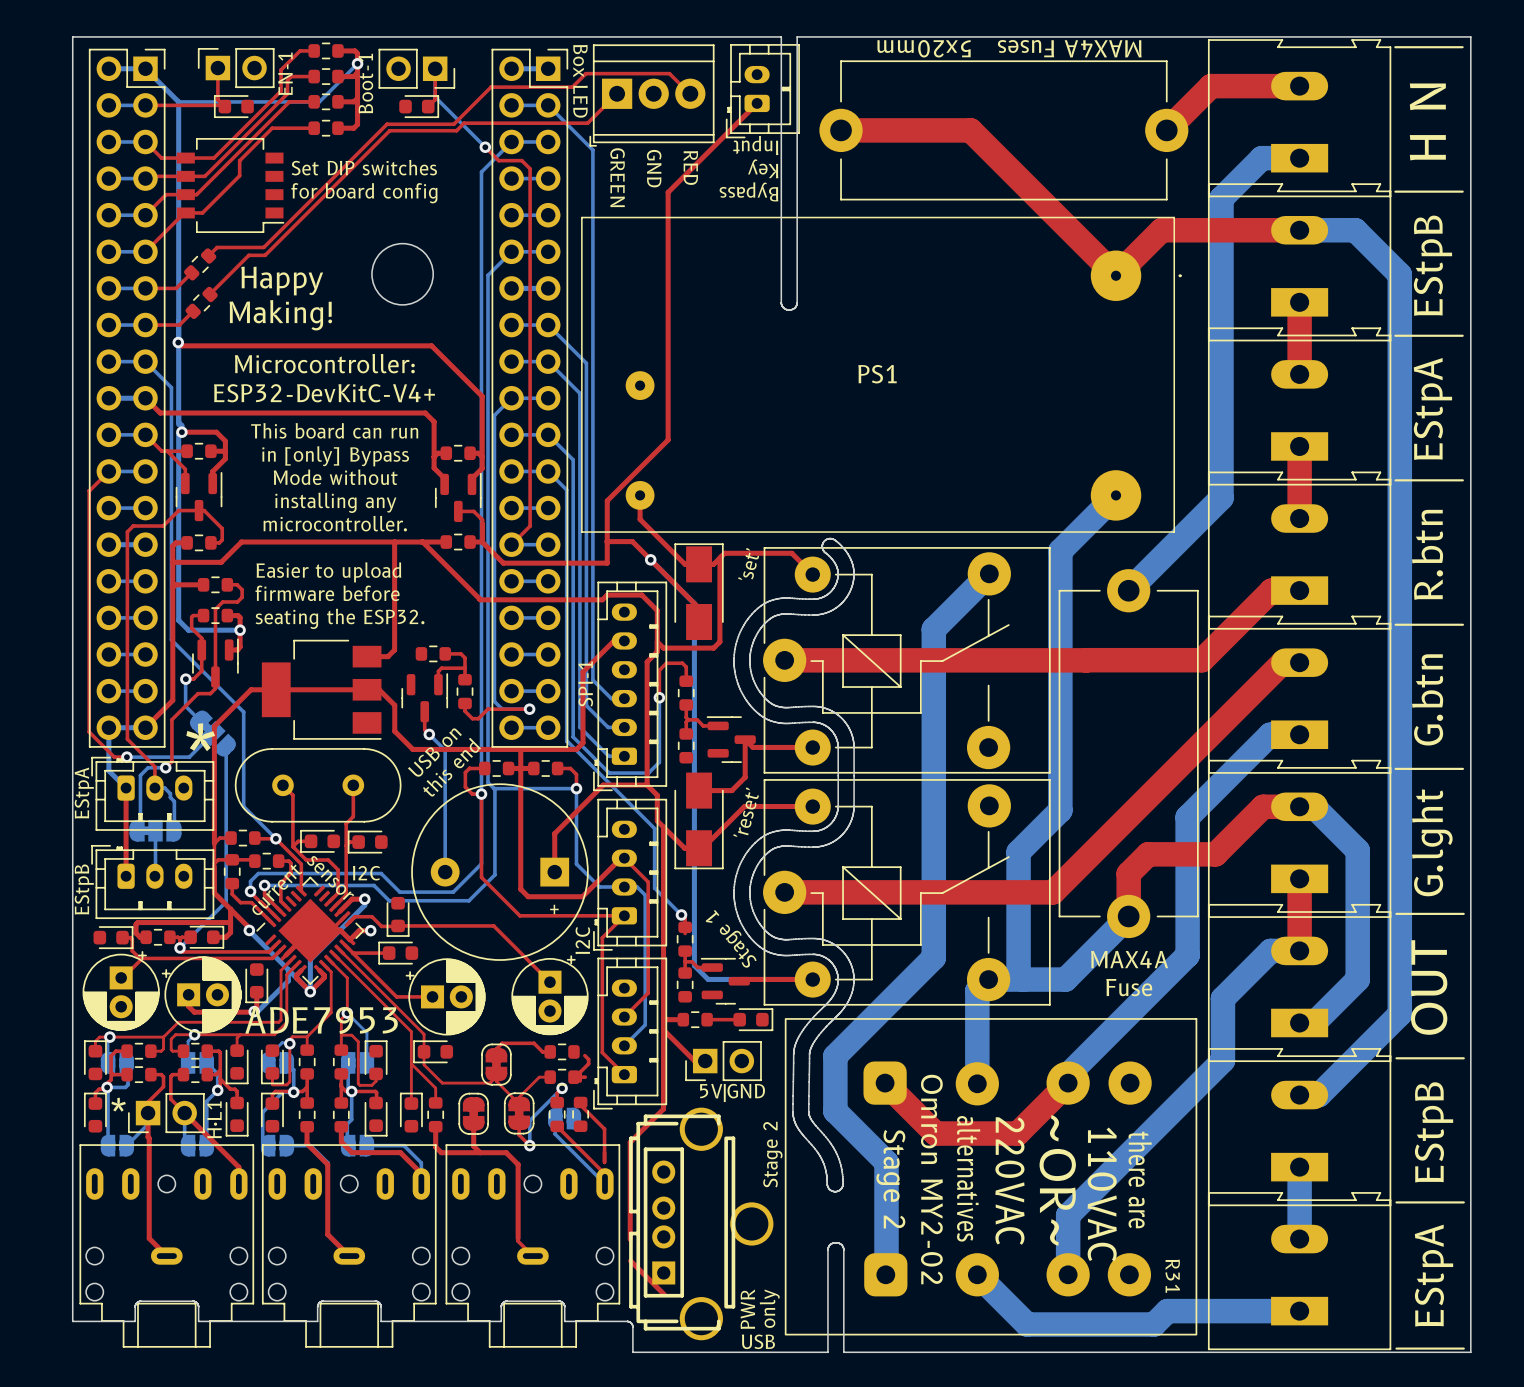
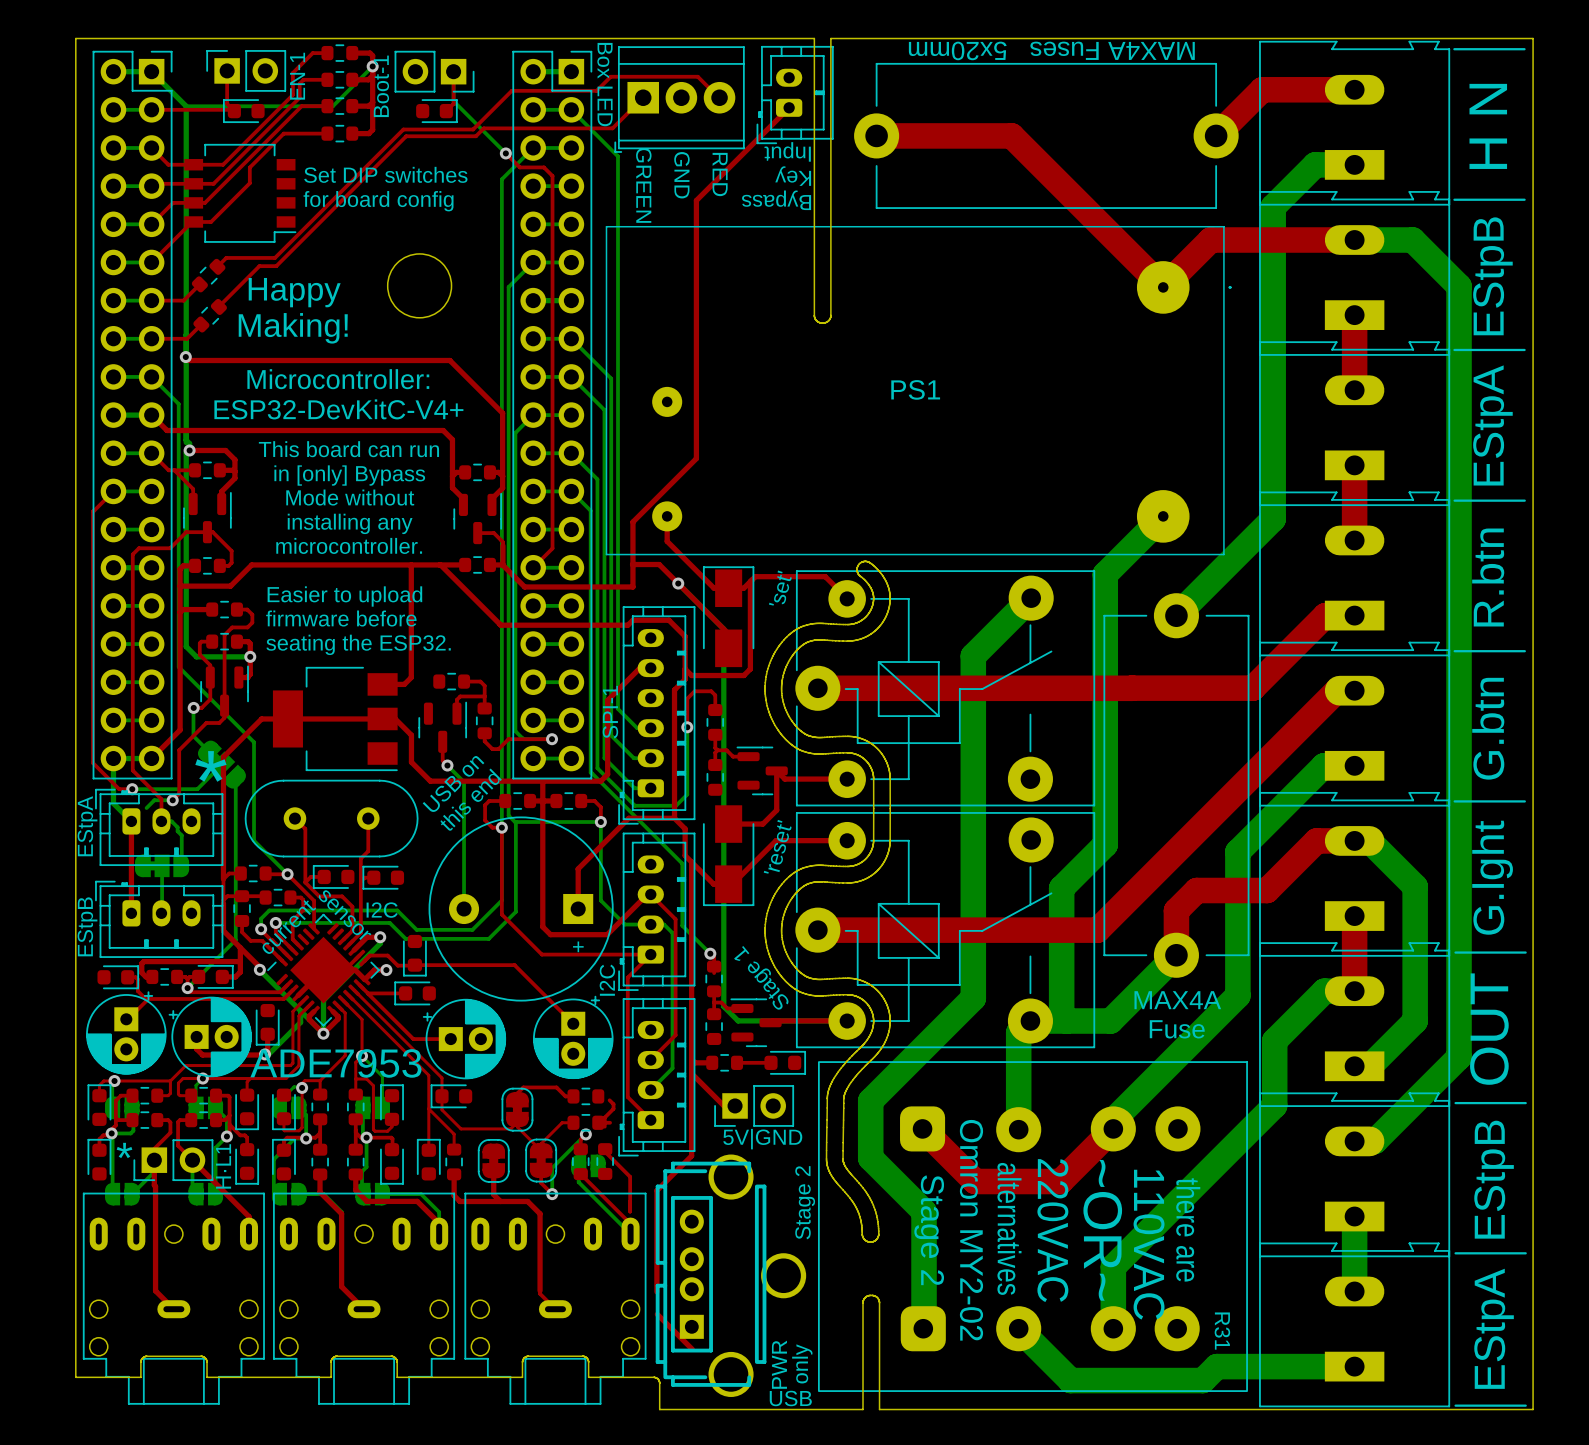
bottom track: (140, 775) (140, 827) (136, 830) -> none

